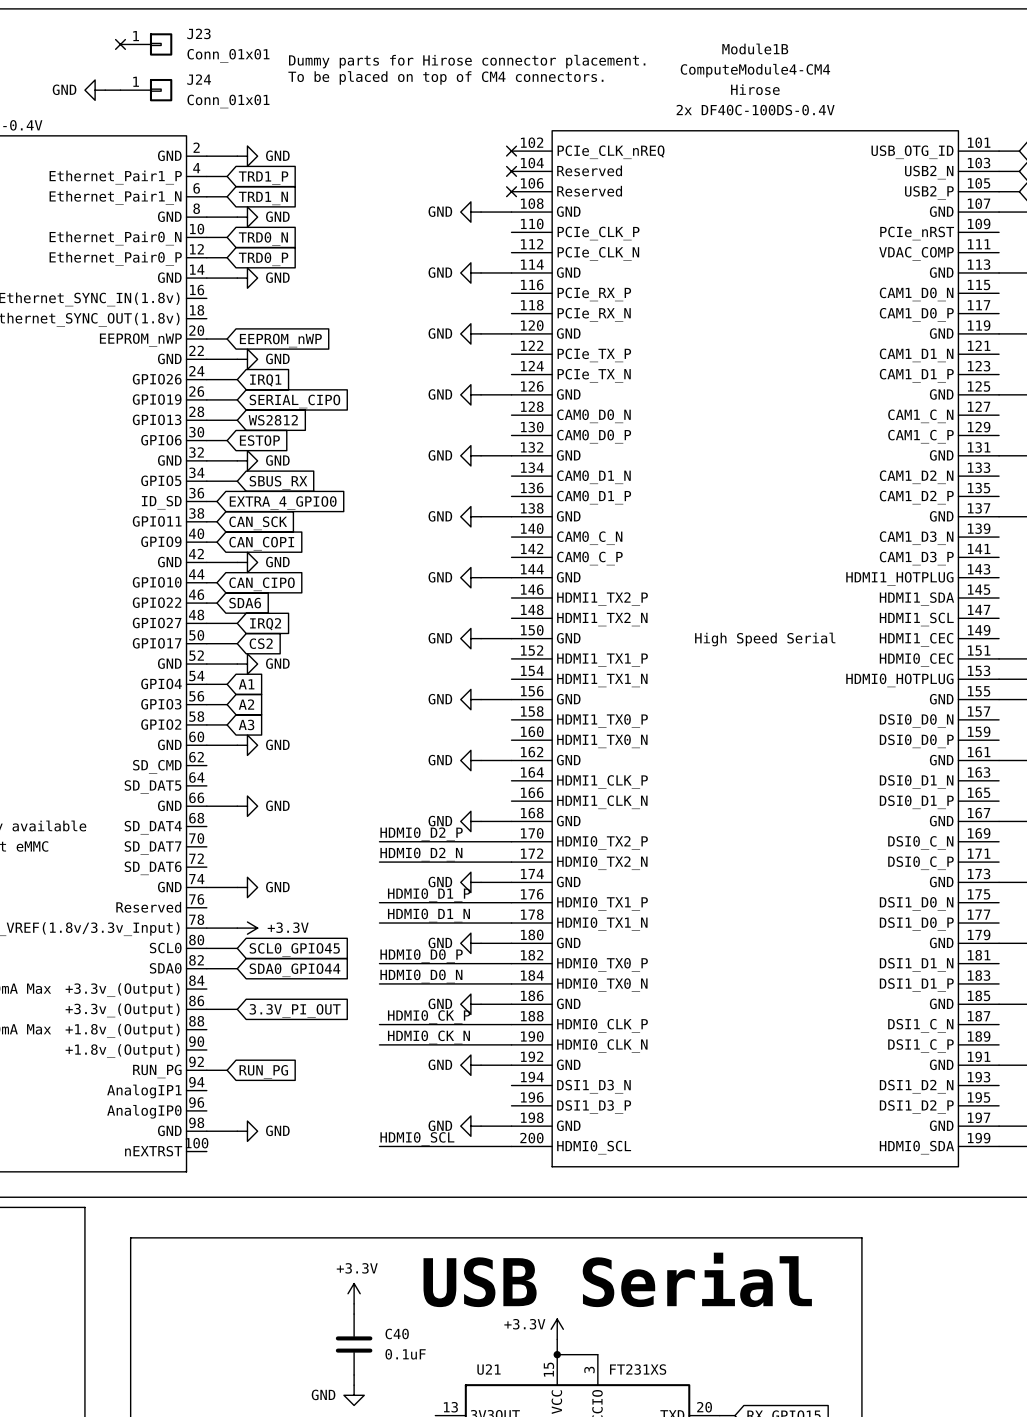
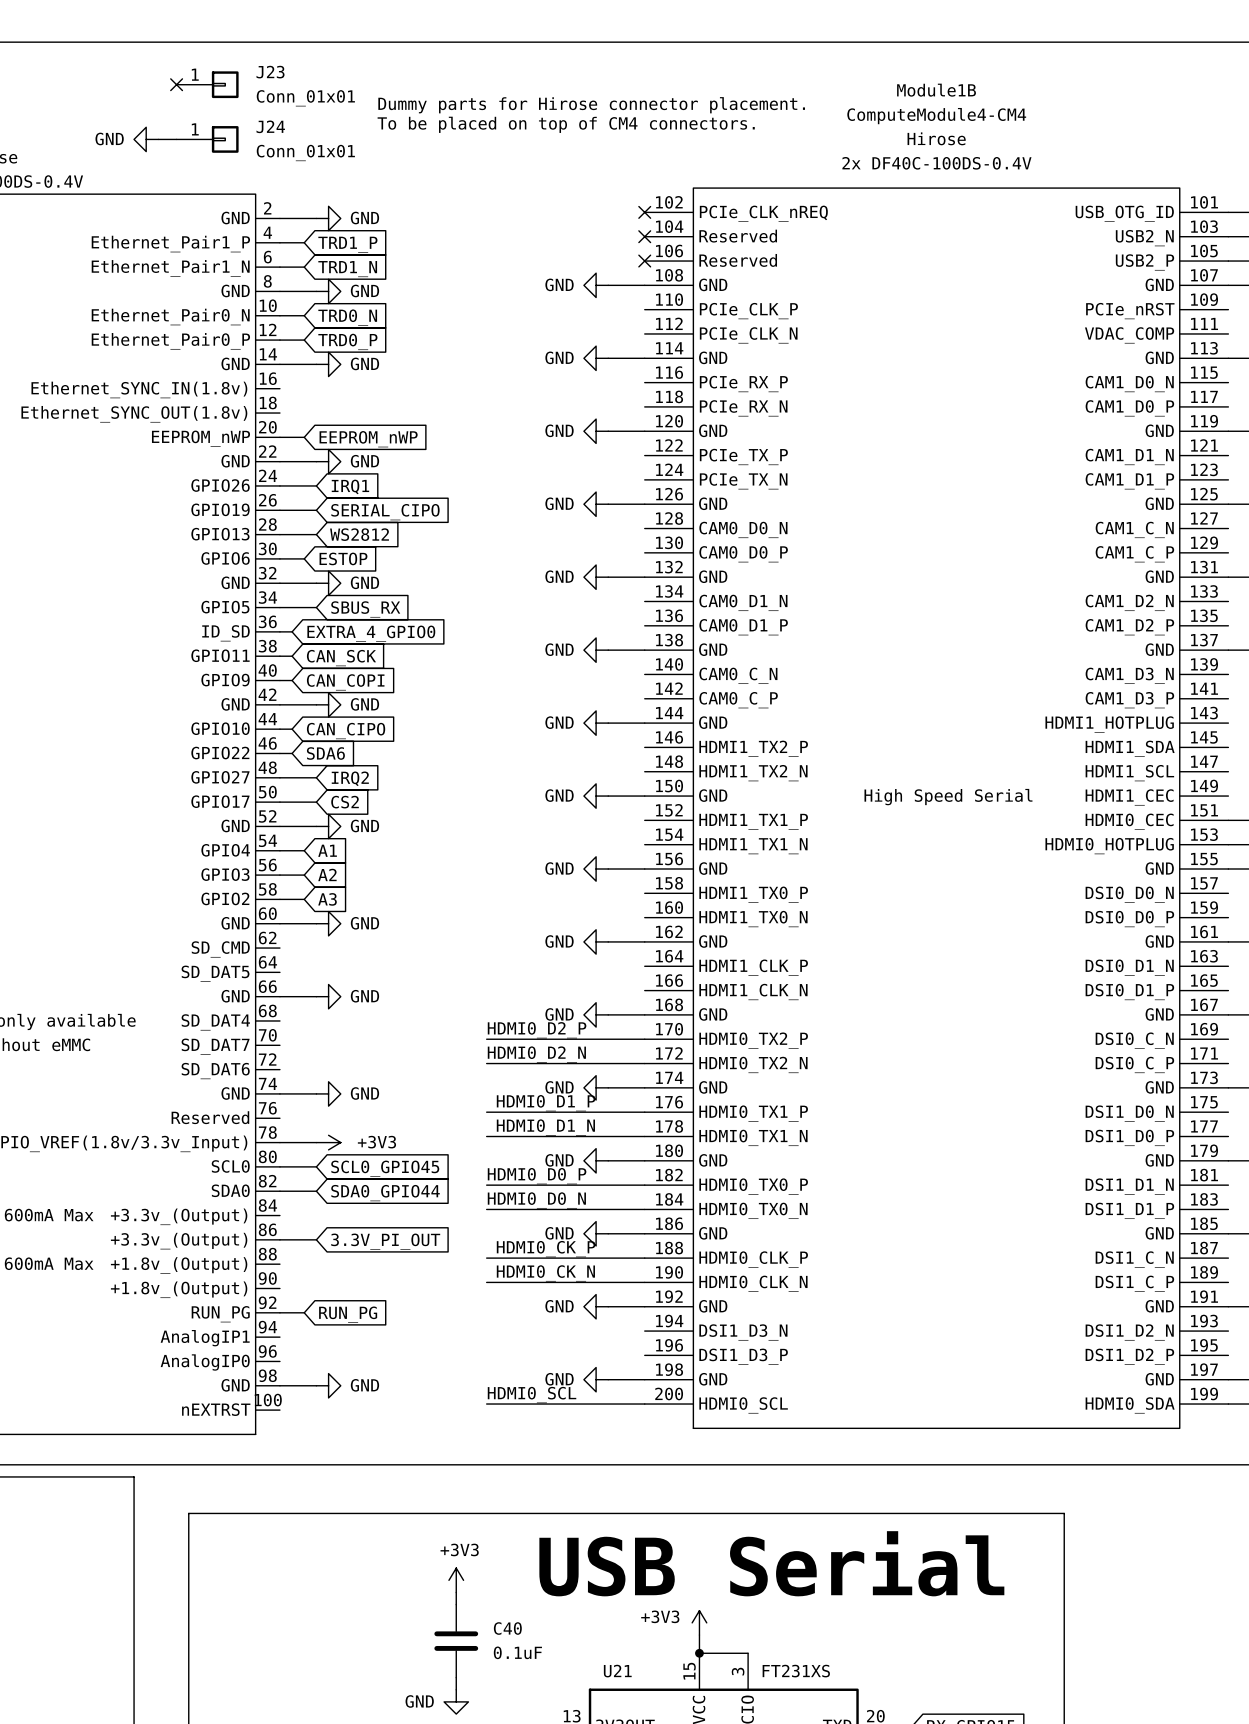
power symbol: +3.3V (247, 928) -> +3V3 (328, 1142)
power symbol: +3.3V (354, 1293) -> +3V3 (456, 1580)
power symbol: +3.3V (557, 1329) -> +3V3 (699, 1622)

